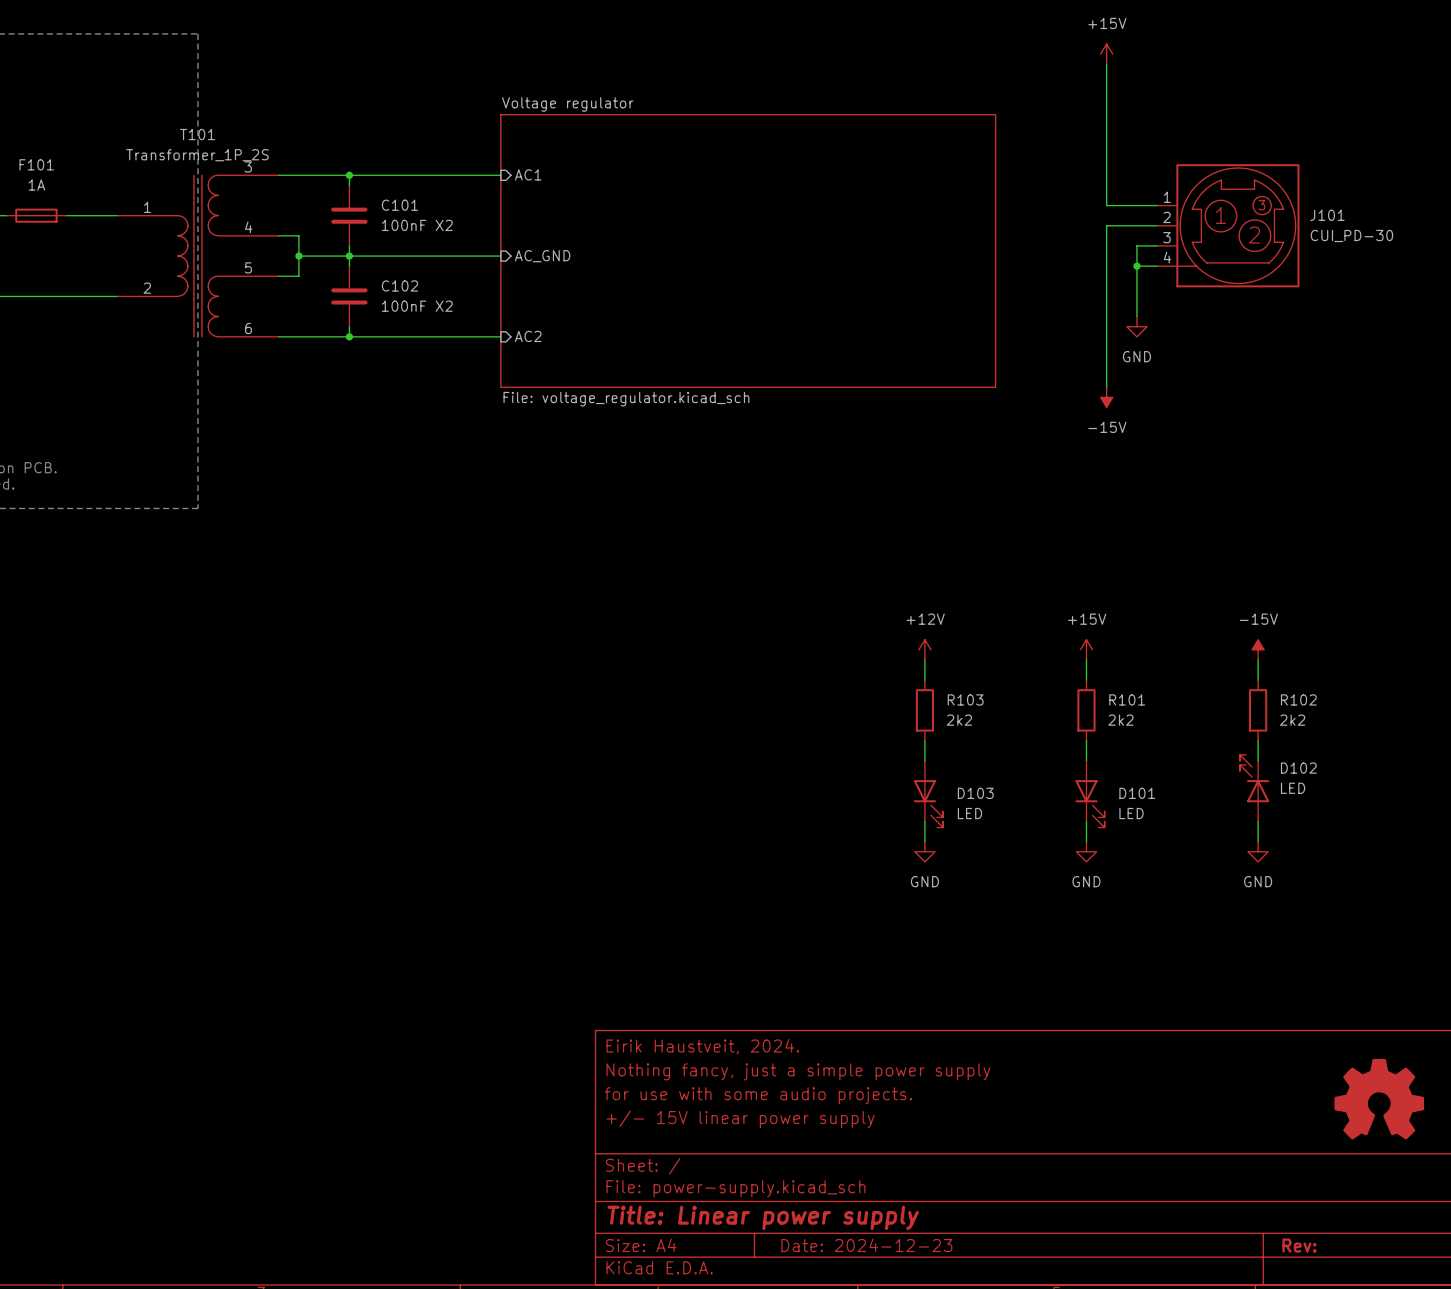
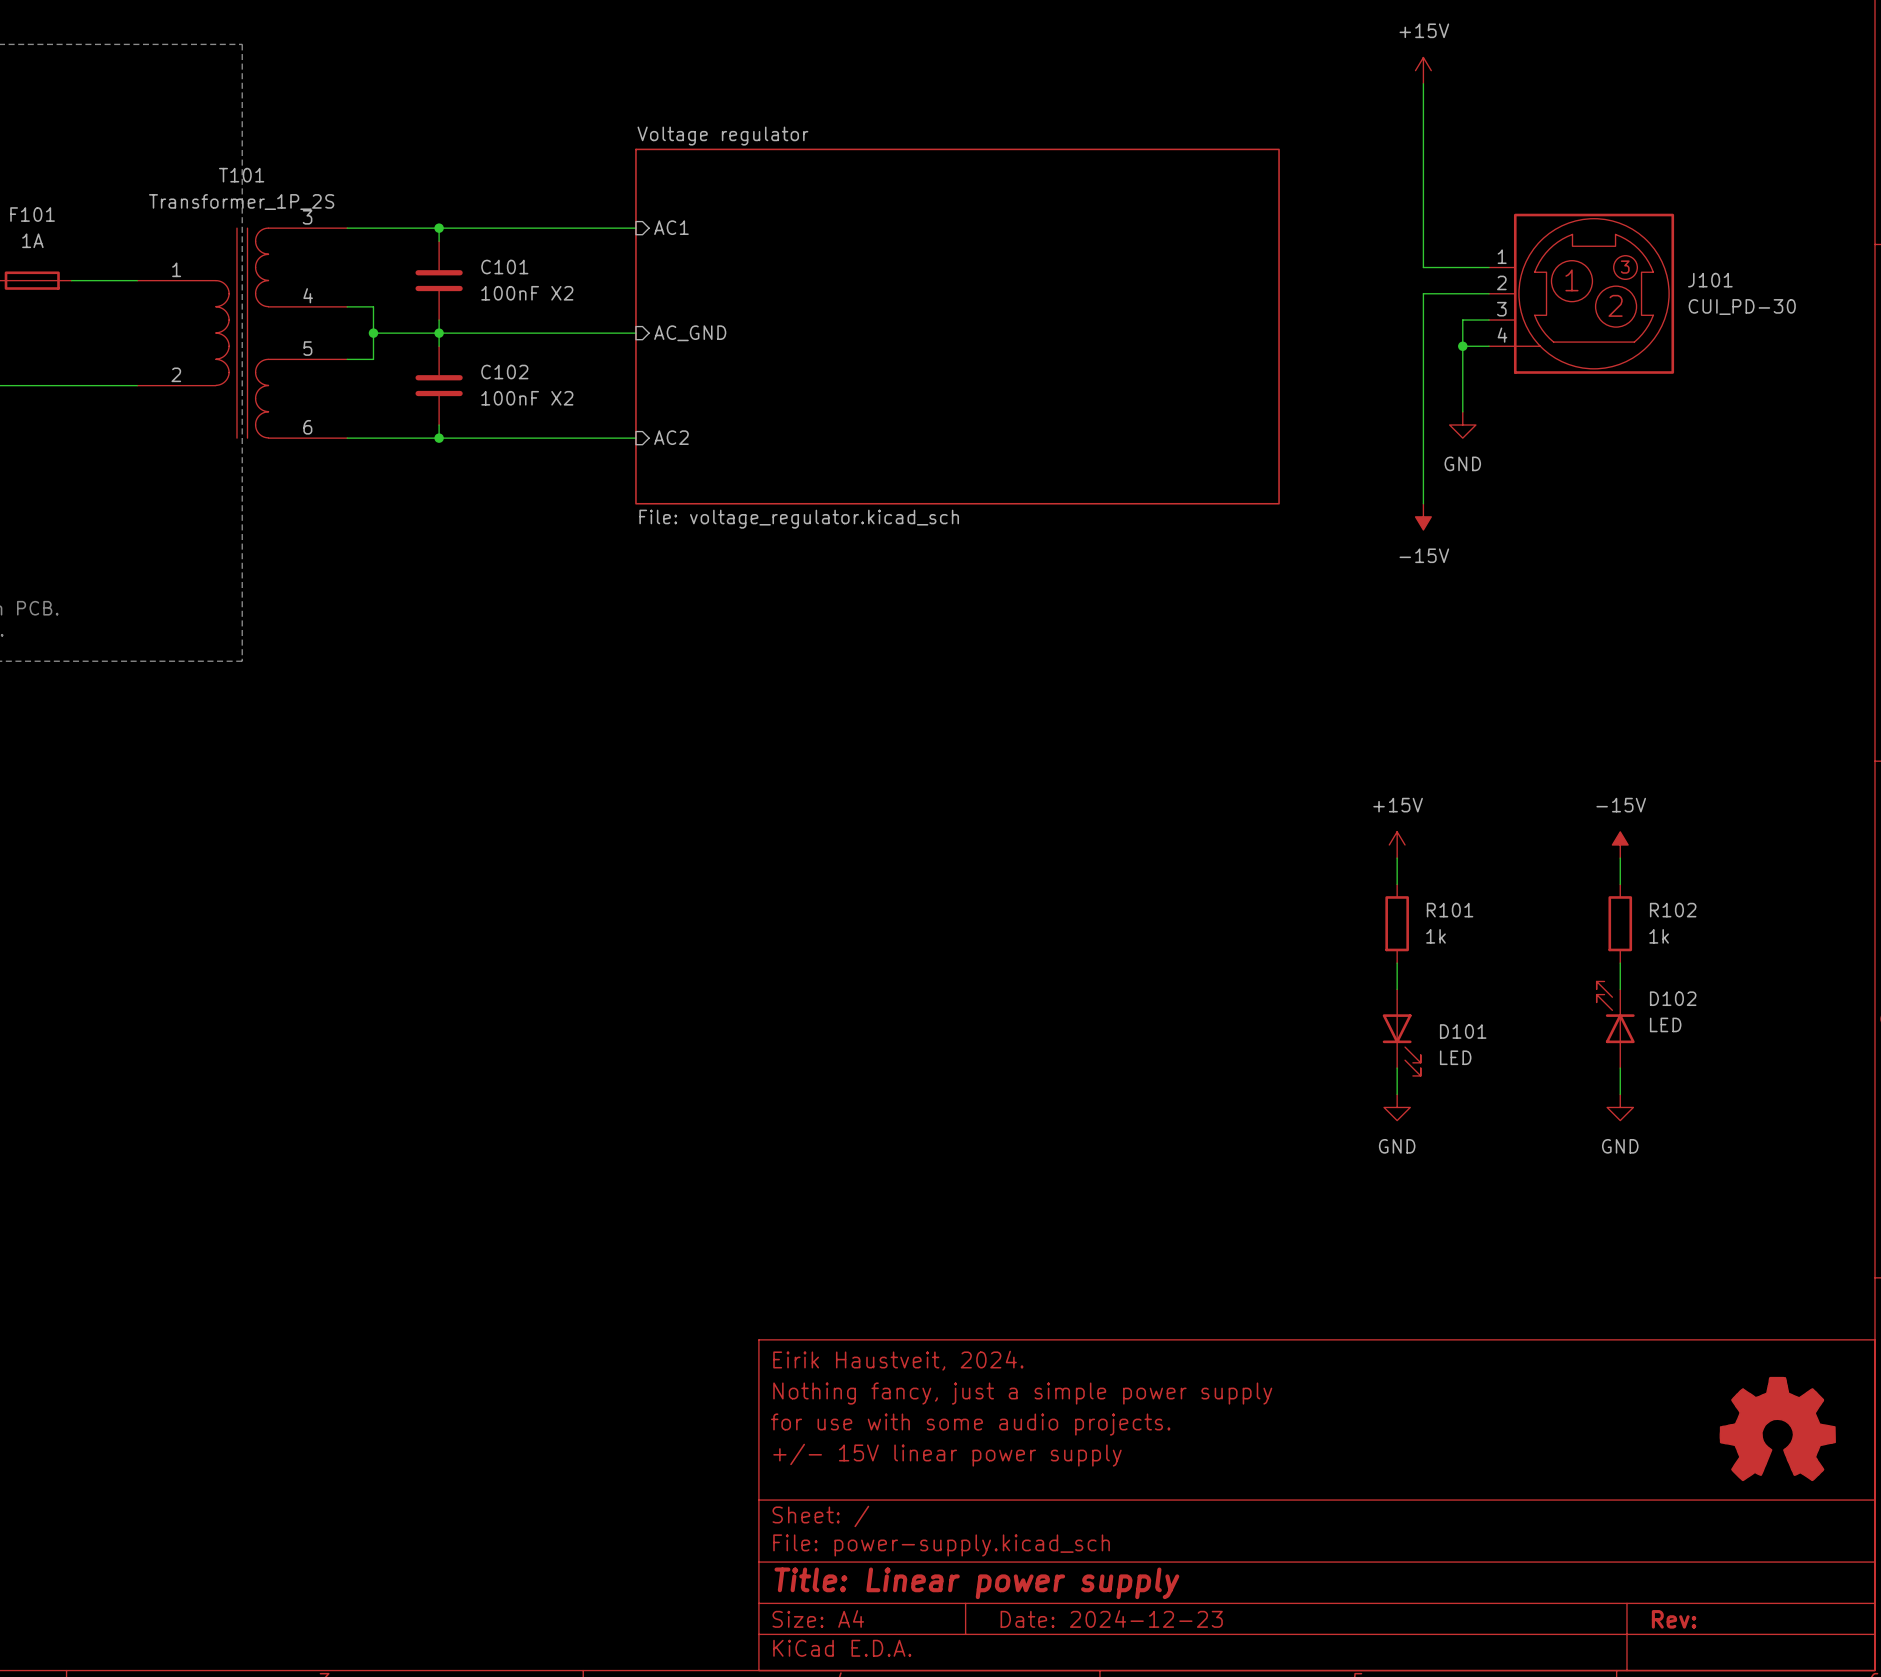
power symbol: +12V (924, 649) -> none
wire: (924, 659) (924, 680) -> none
R103: 2k2 (924, 710) -> none
R101 value: 2k2 (1120, 720) -> 1k (1436, 936)
R102 value: 2k2 (1292, 720) -> 1k (1659, 936)
wire: (924, 740) (924, 760) -> none
D103: LED (928, 794) -> none
wire: (924, 821) (924, 841) -> none
power symbol: GND (924, 851) -> none

